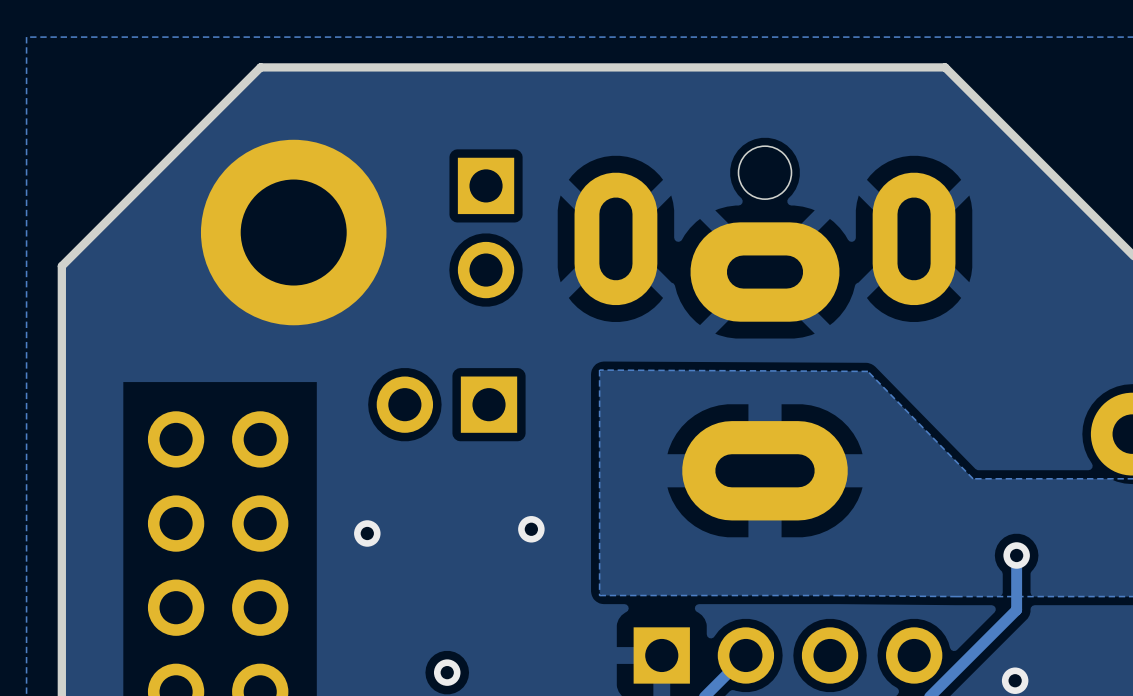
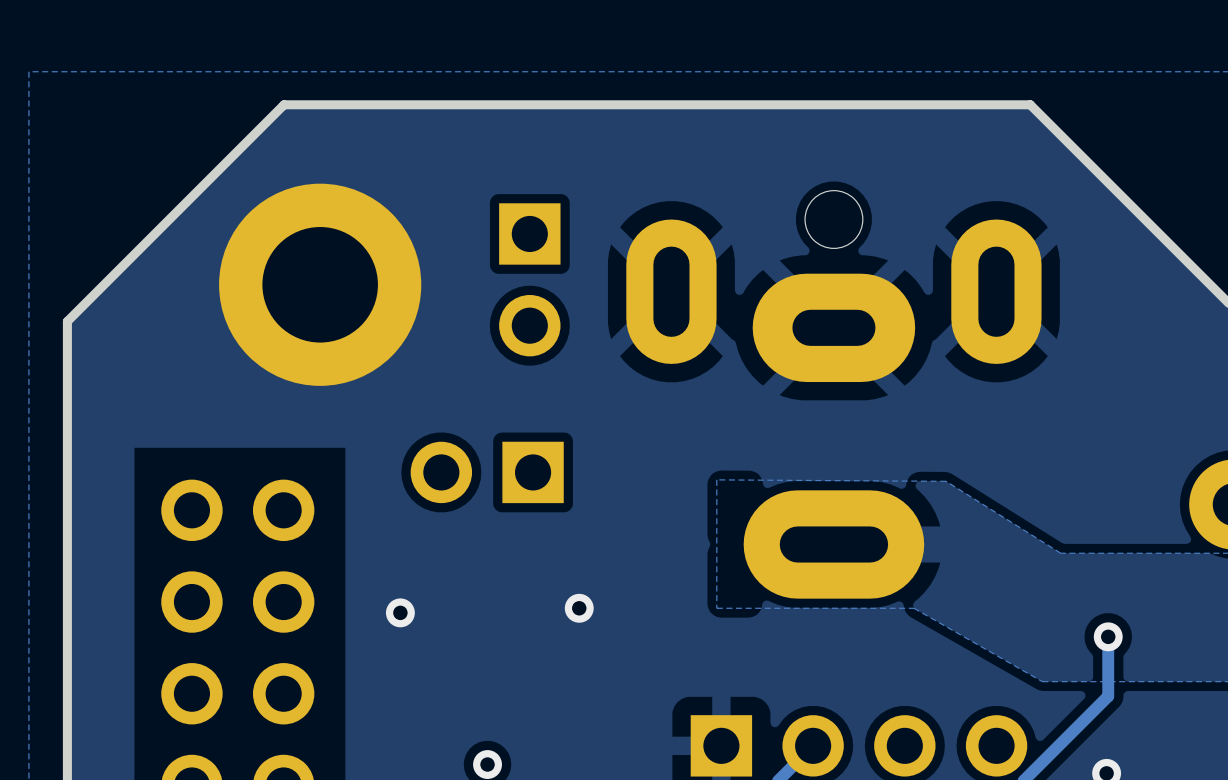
zone outline: (973, 478) (867, 371) (599, 370) (599, 595) (956, 596) -> (1060, 553) (946, 481) (716, 479) (716, 608) (914, 608) (1042, 681)

